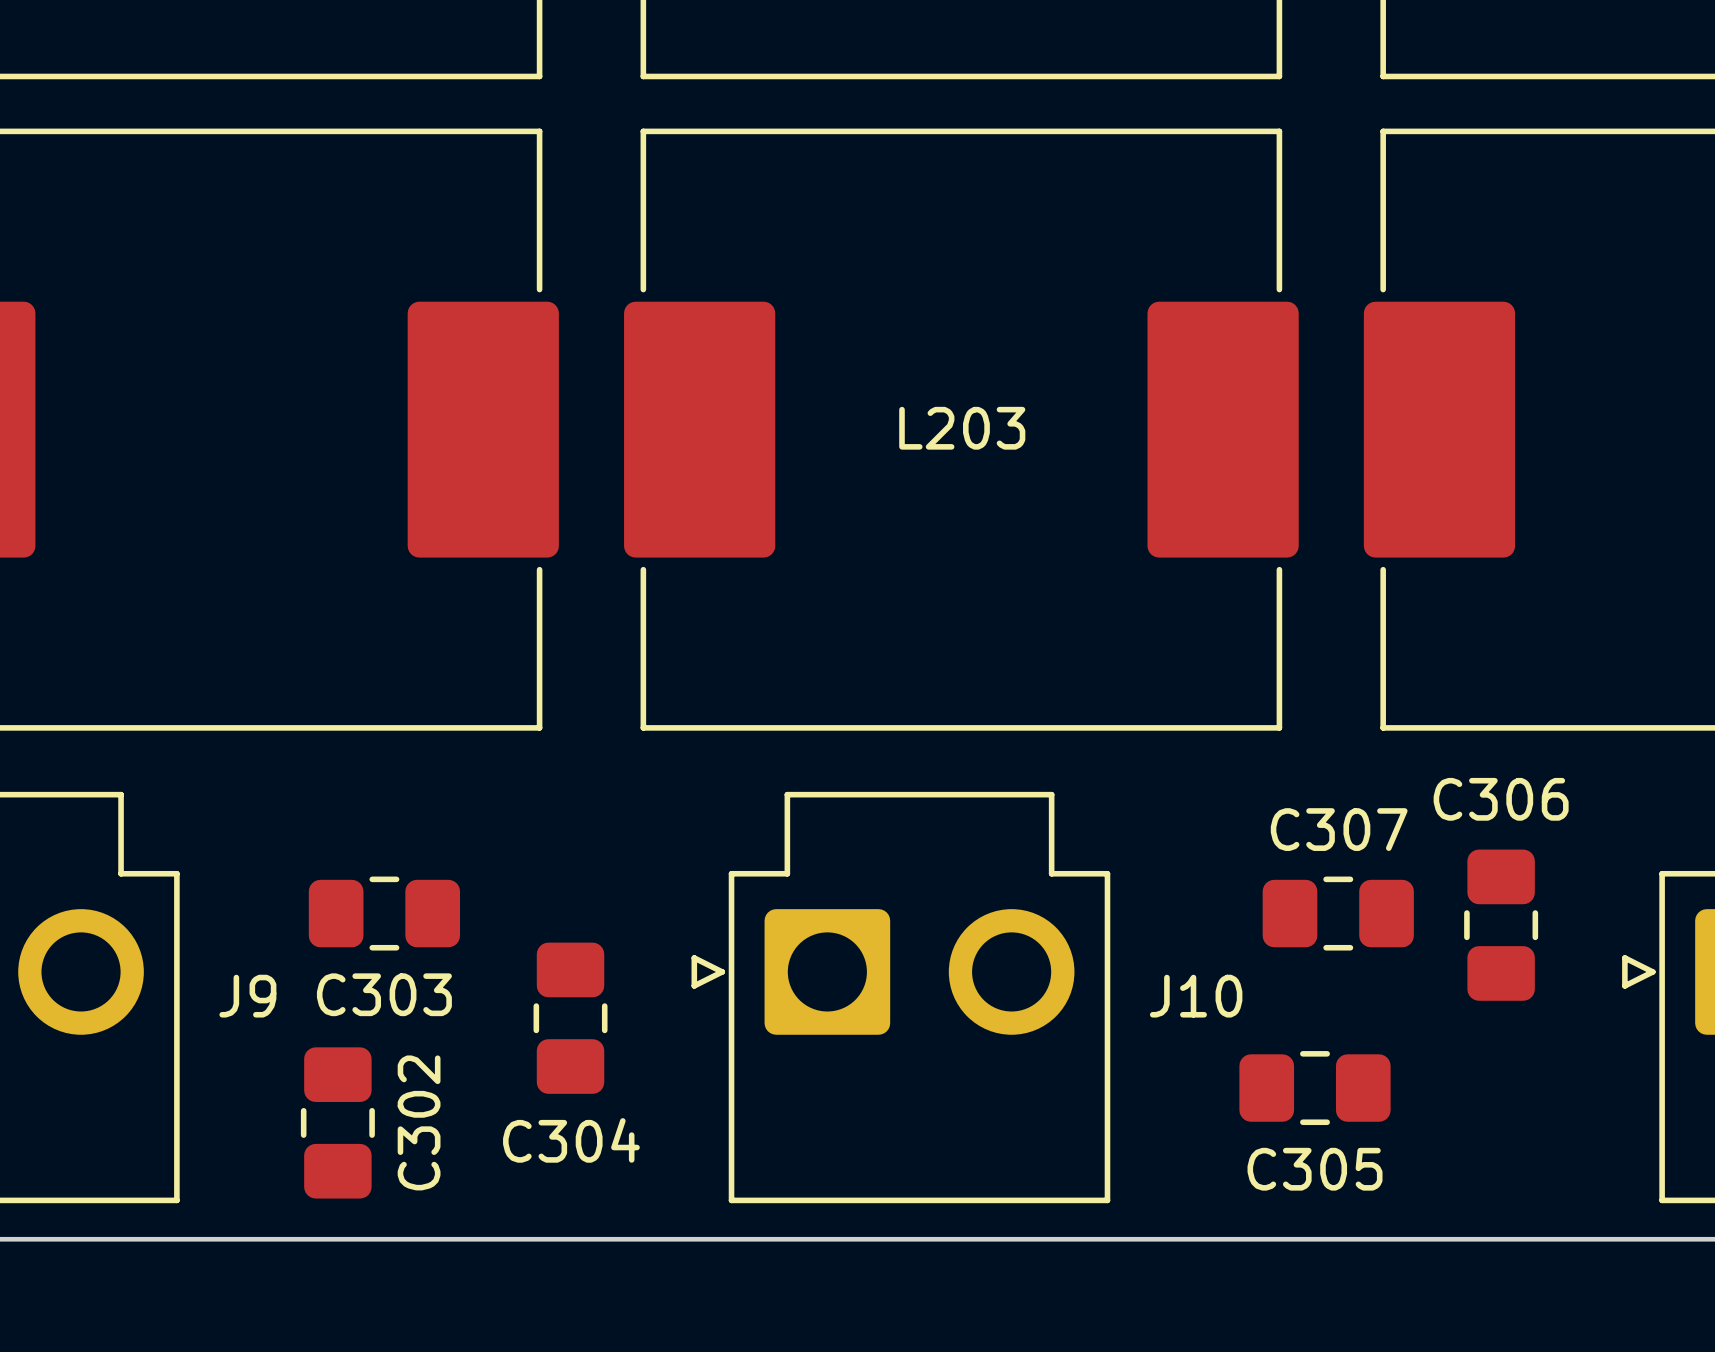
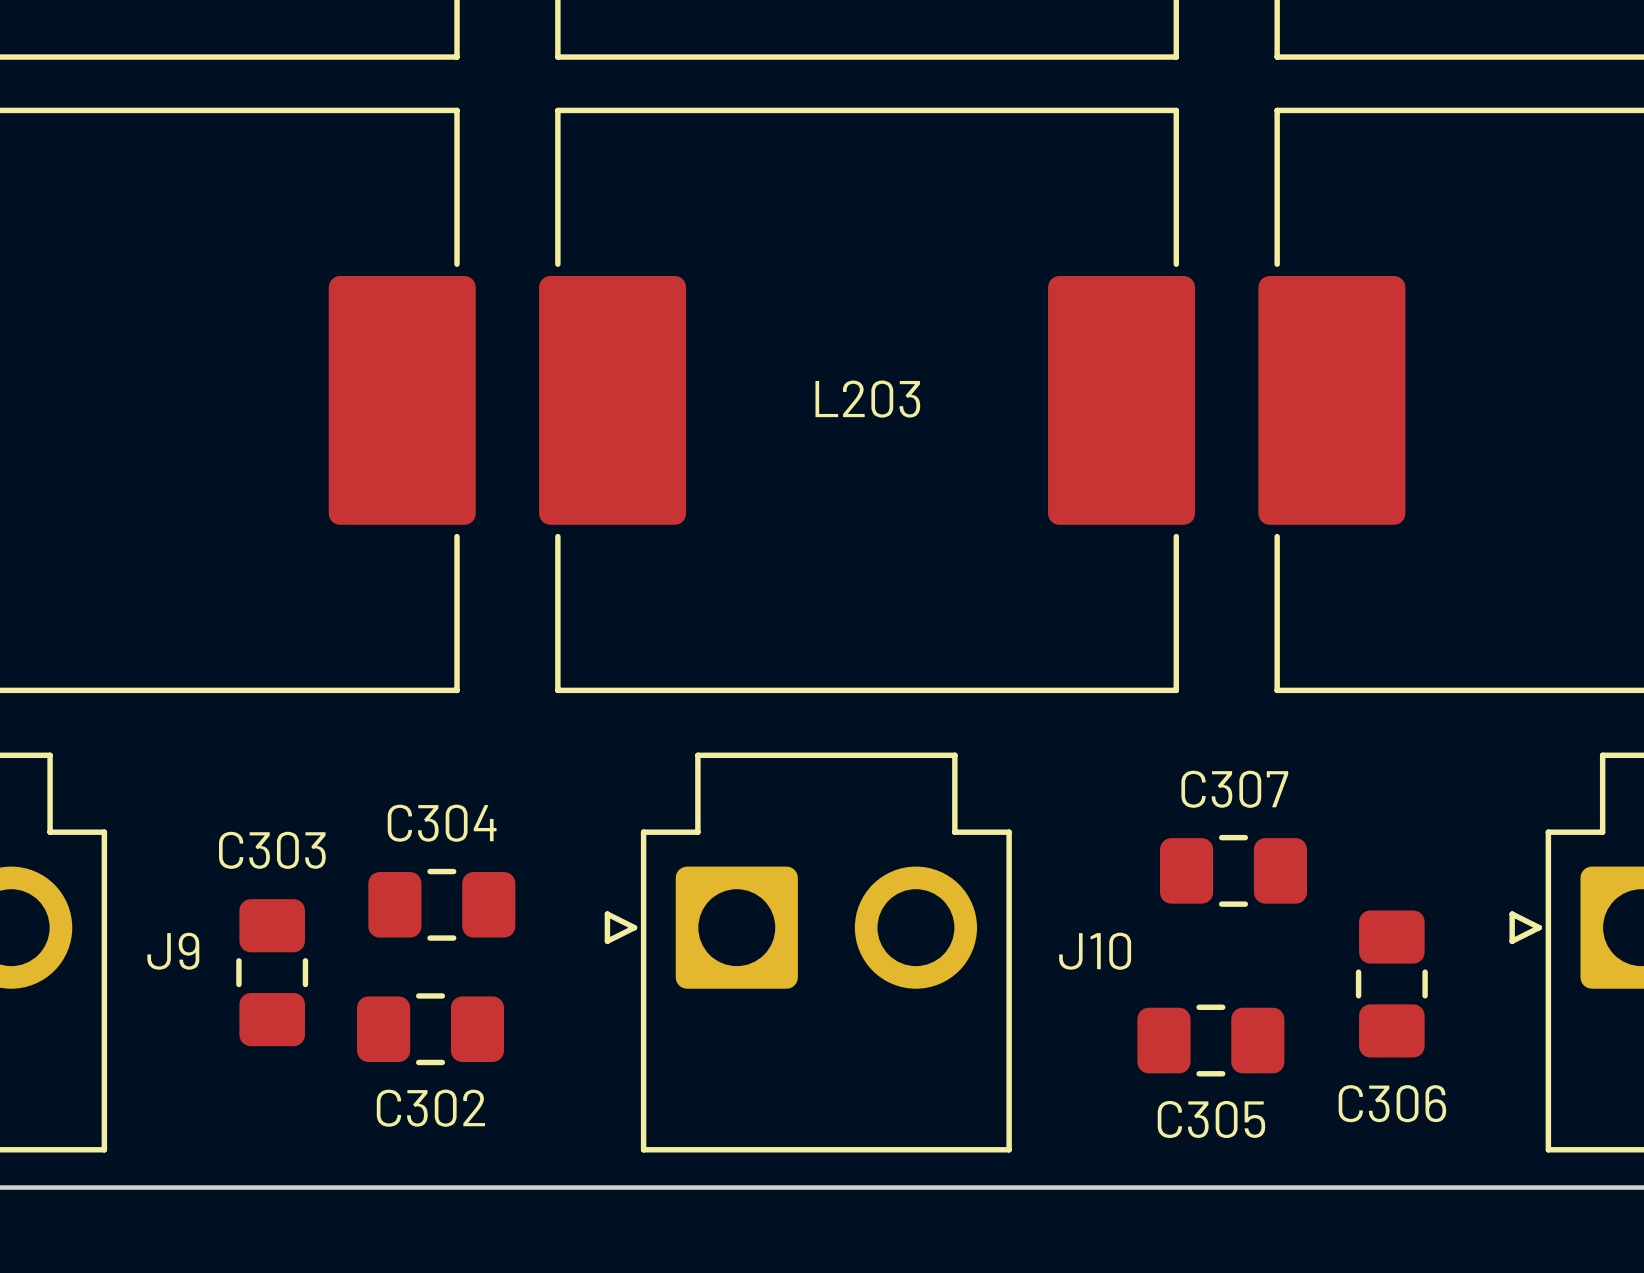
C306 name position: C306 (1501, 799) -> C306 (1392, 1103)
C303 rotation: 0° (384, 913) -> 90° clockwise (272, 972)
C303 position: (384, 913) -> (272, 972)
C306 position: (1501, 925) -> (1391, 983)
C303 name position: C303 (384, 994) -> C303 (272, 850)
C304 rotation: 0° (570, 1018) -> 90° clockwise (441, 904)
C302 rotation: 0° (337, 1122) -> 90° clockwise (430, 1029)
C302 position: (337, 1122) -> (430, 1029)
C304 name position: C304 (571, 1140) -> C304 (442, 823)

